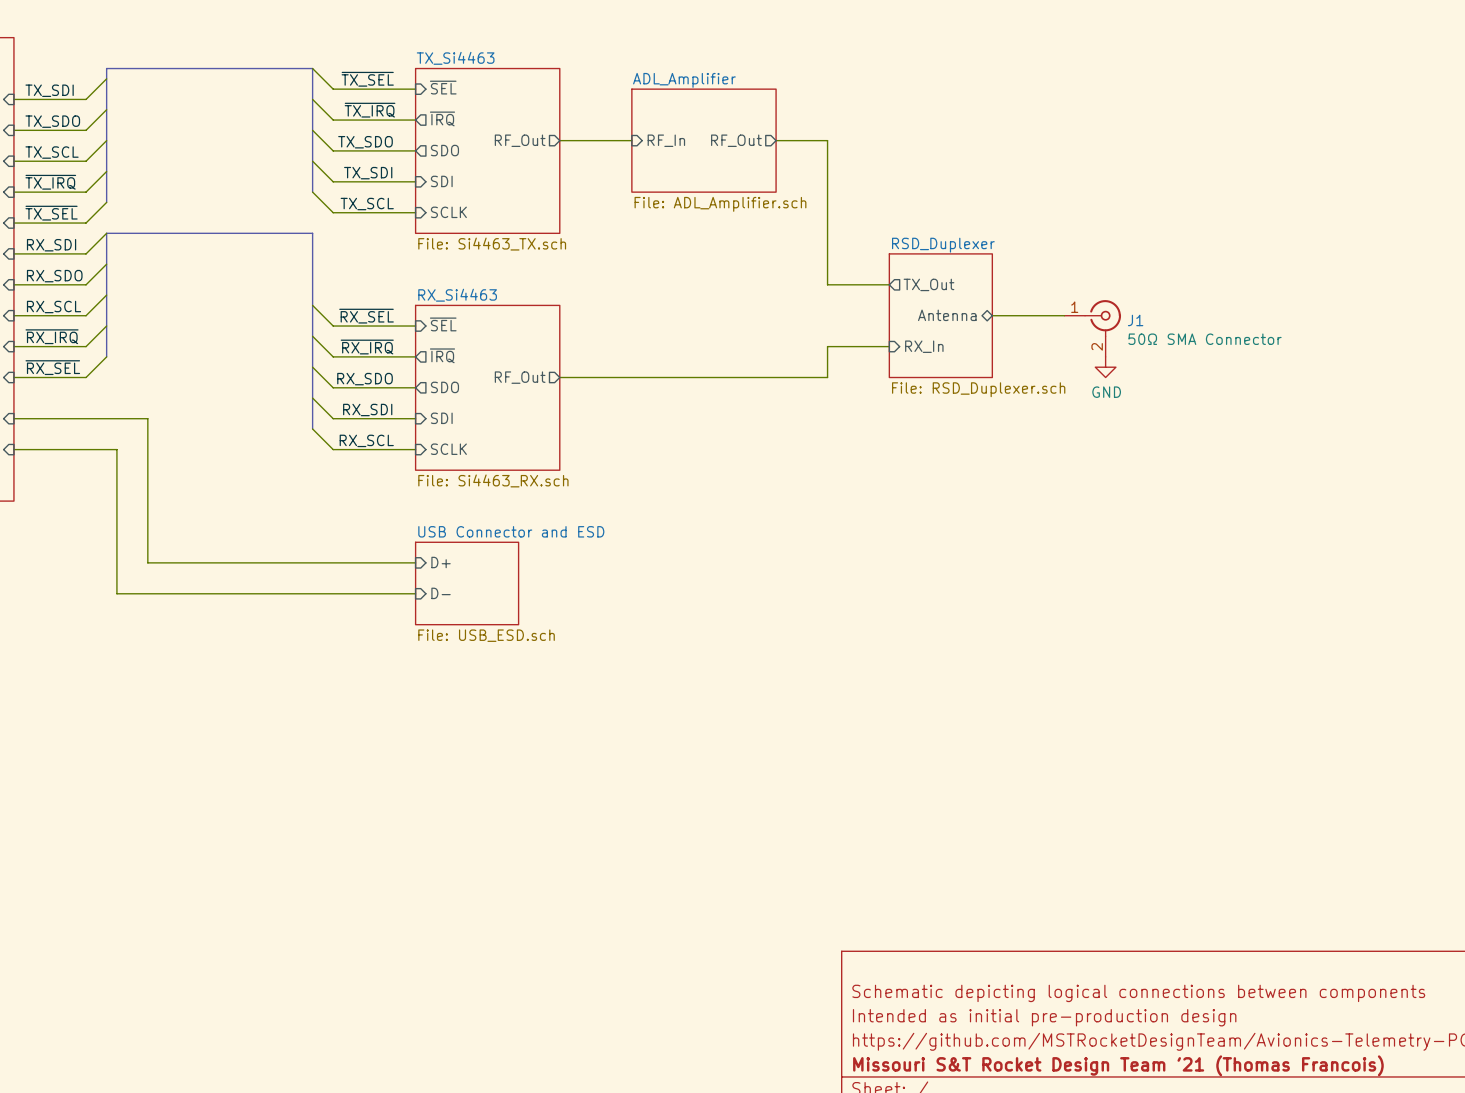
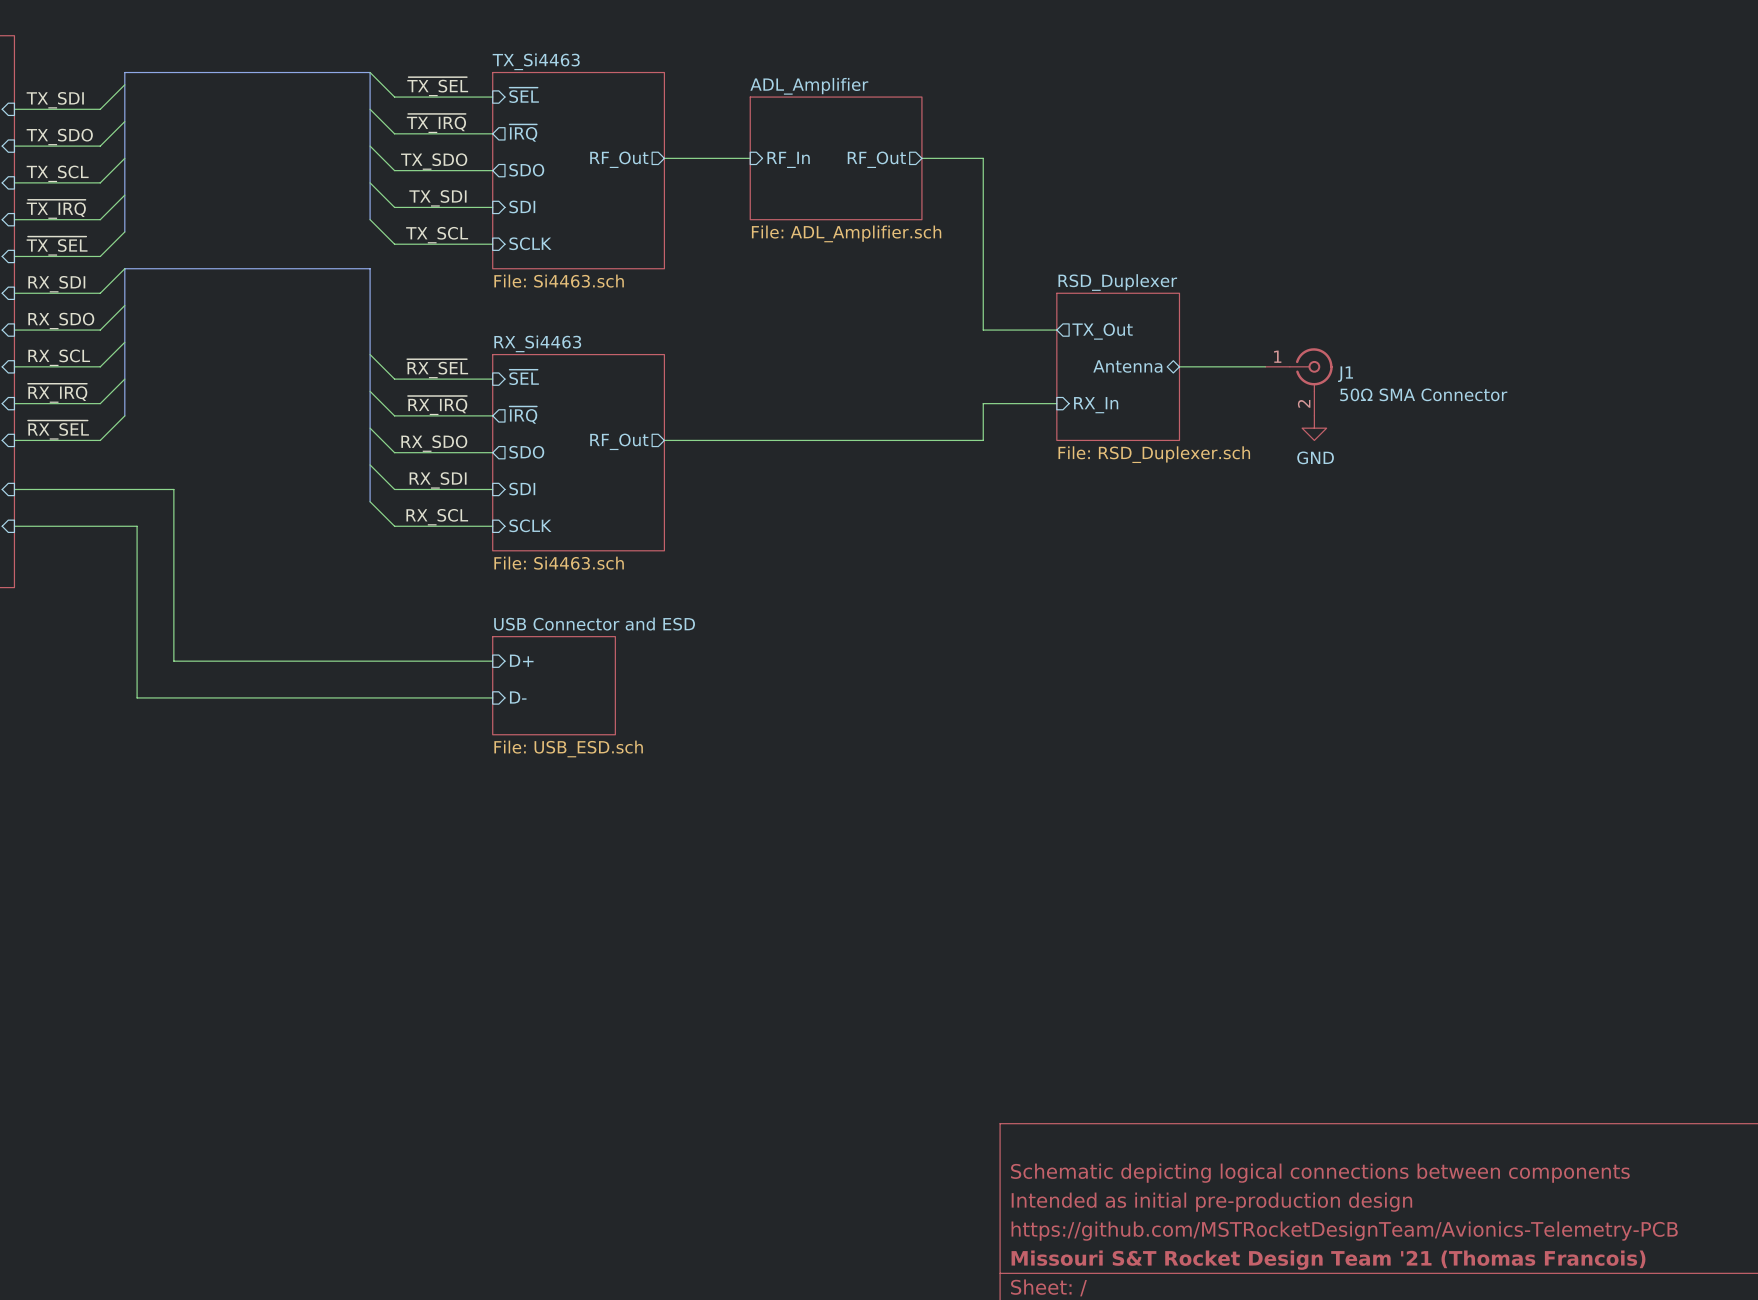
sheet TX_Si4463 value: File: Si4463_TX.sch (492, 244) -> File: Si4463.sch (559, 281)
sheet RX_Si4463 value: File: Si4463_RX.sch (493, 480) -> File: Si4463.sch (559, 563)

